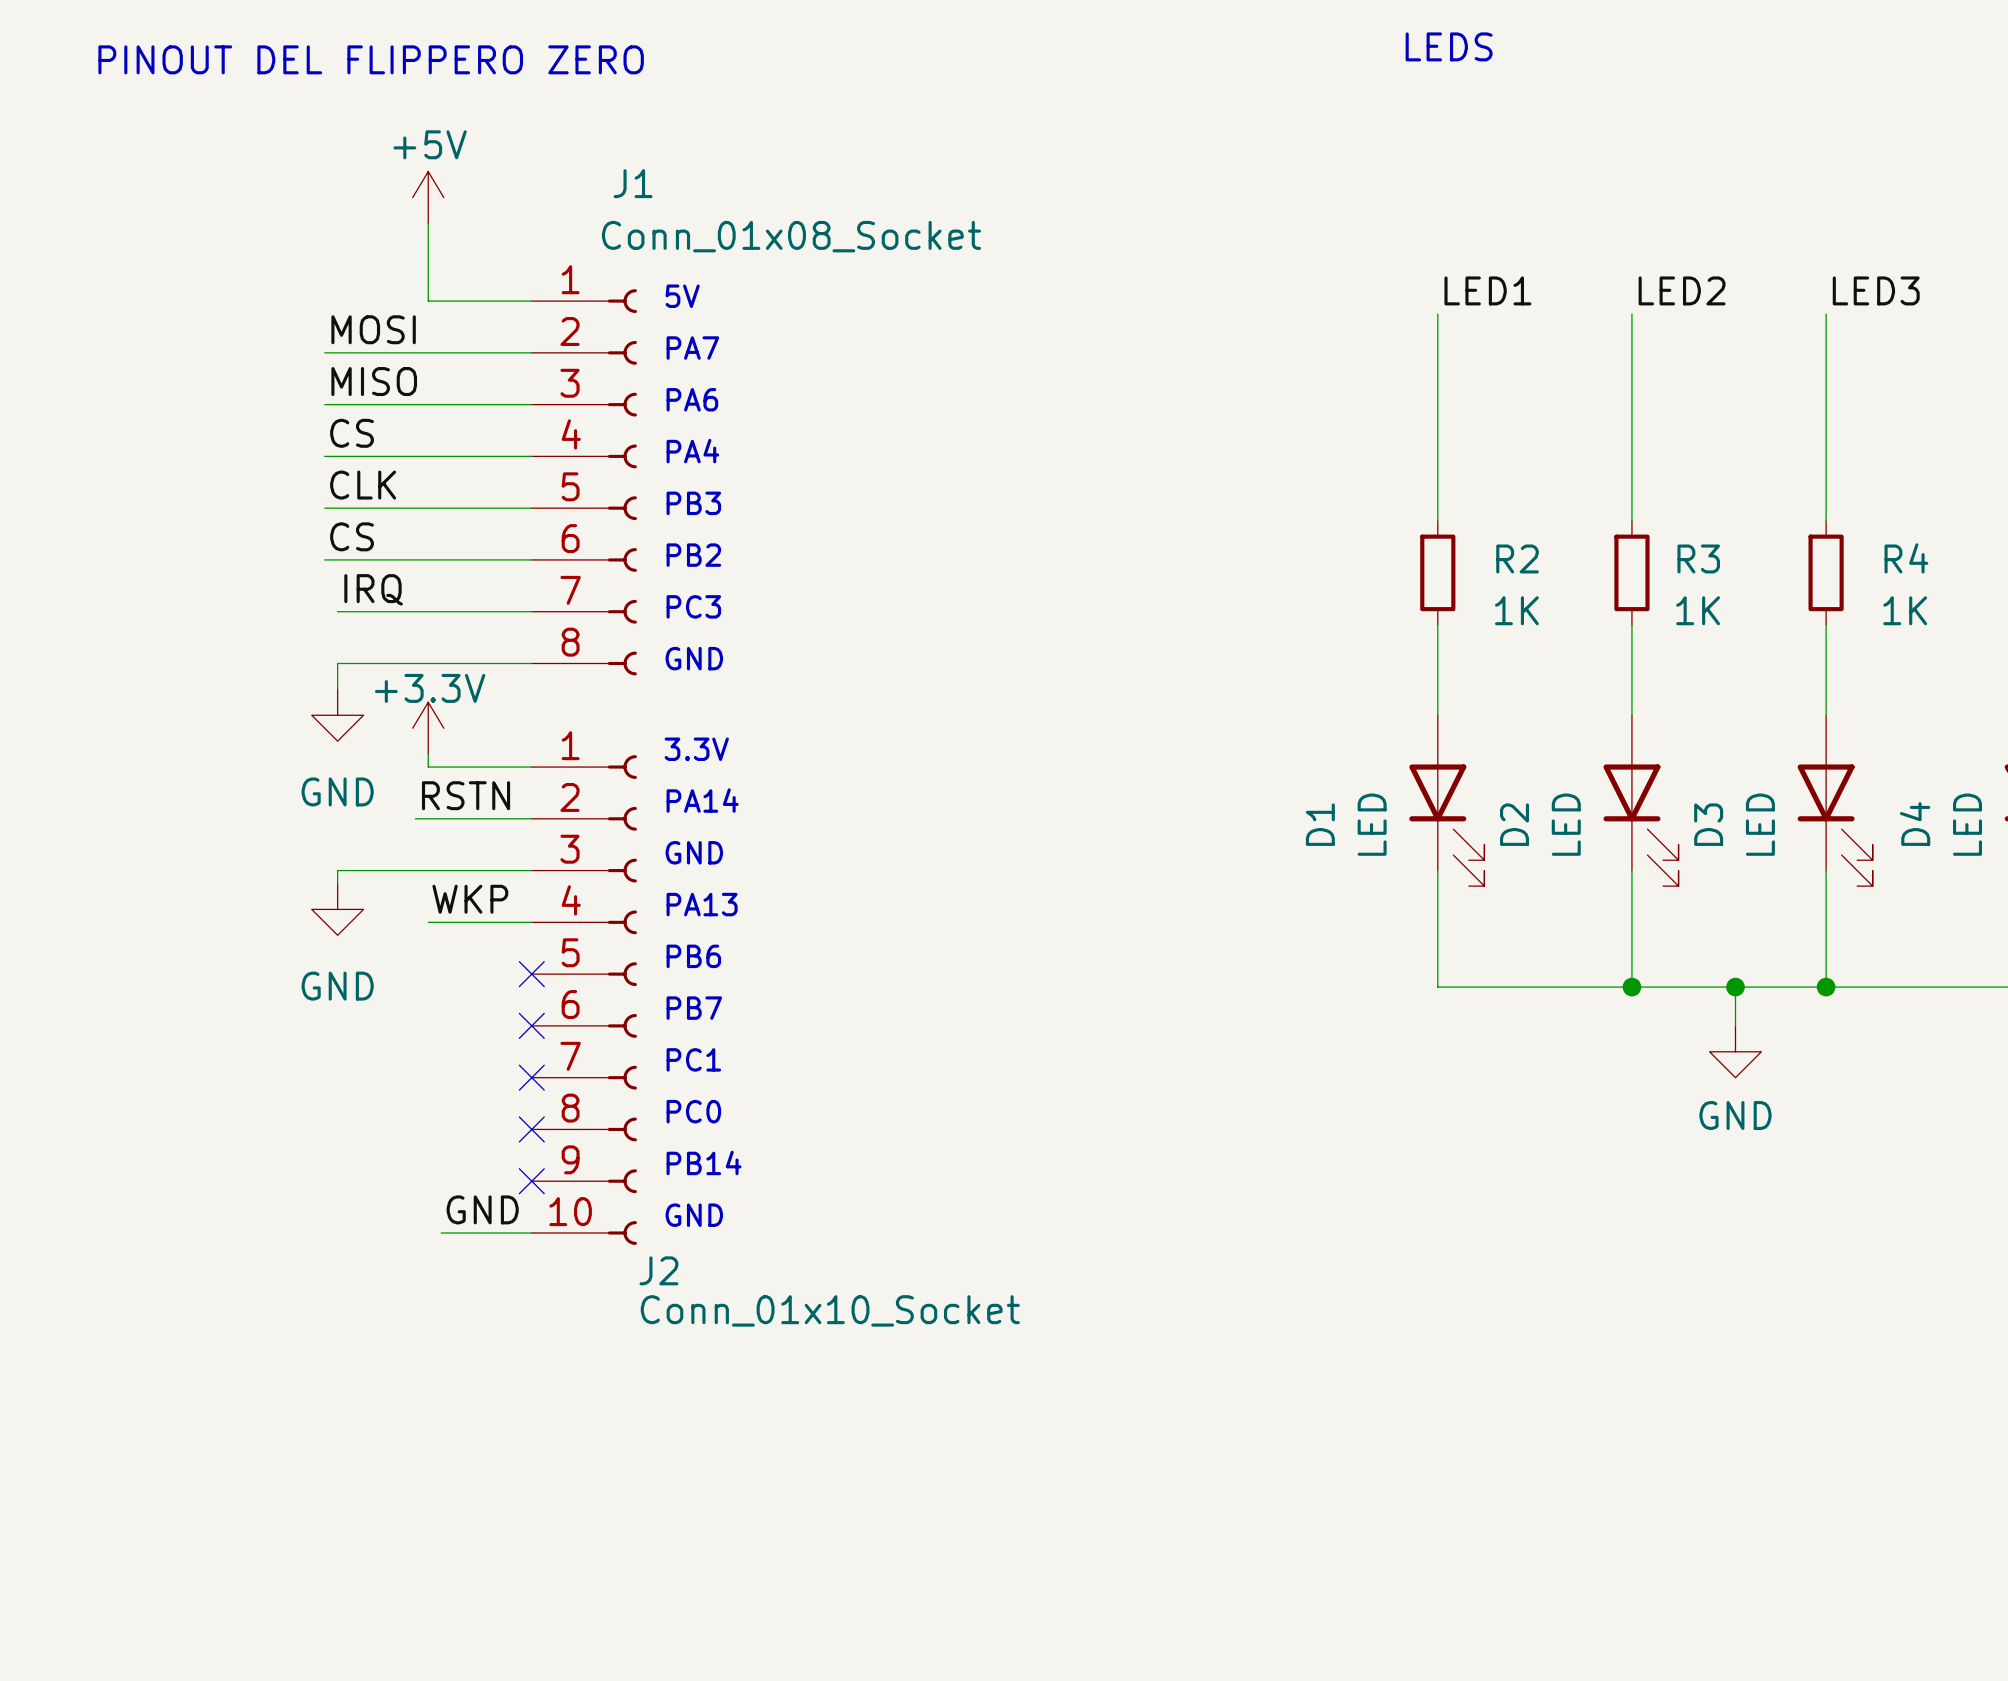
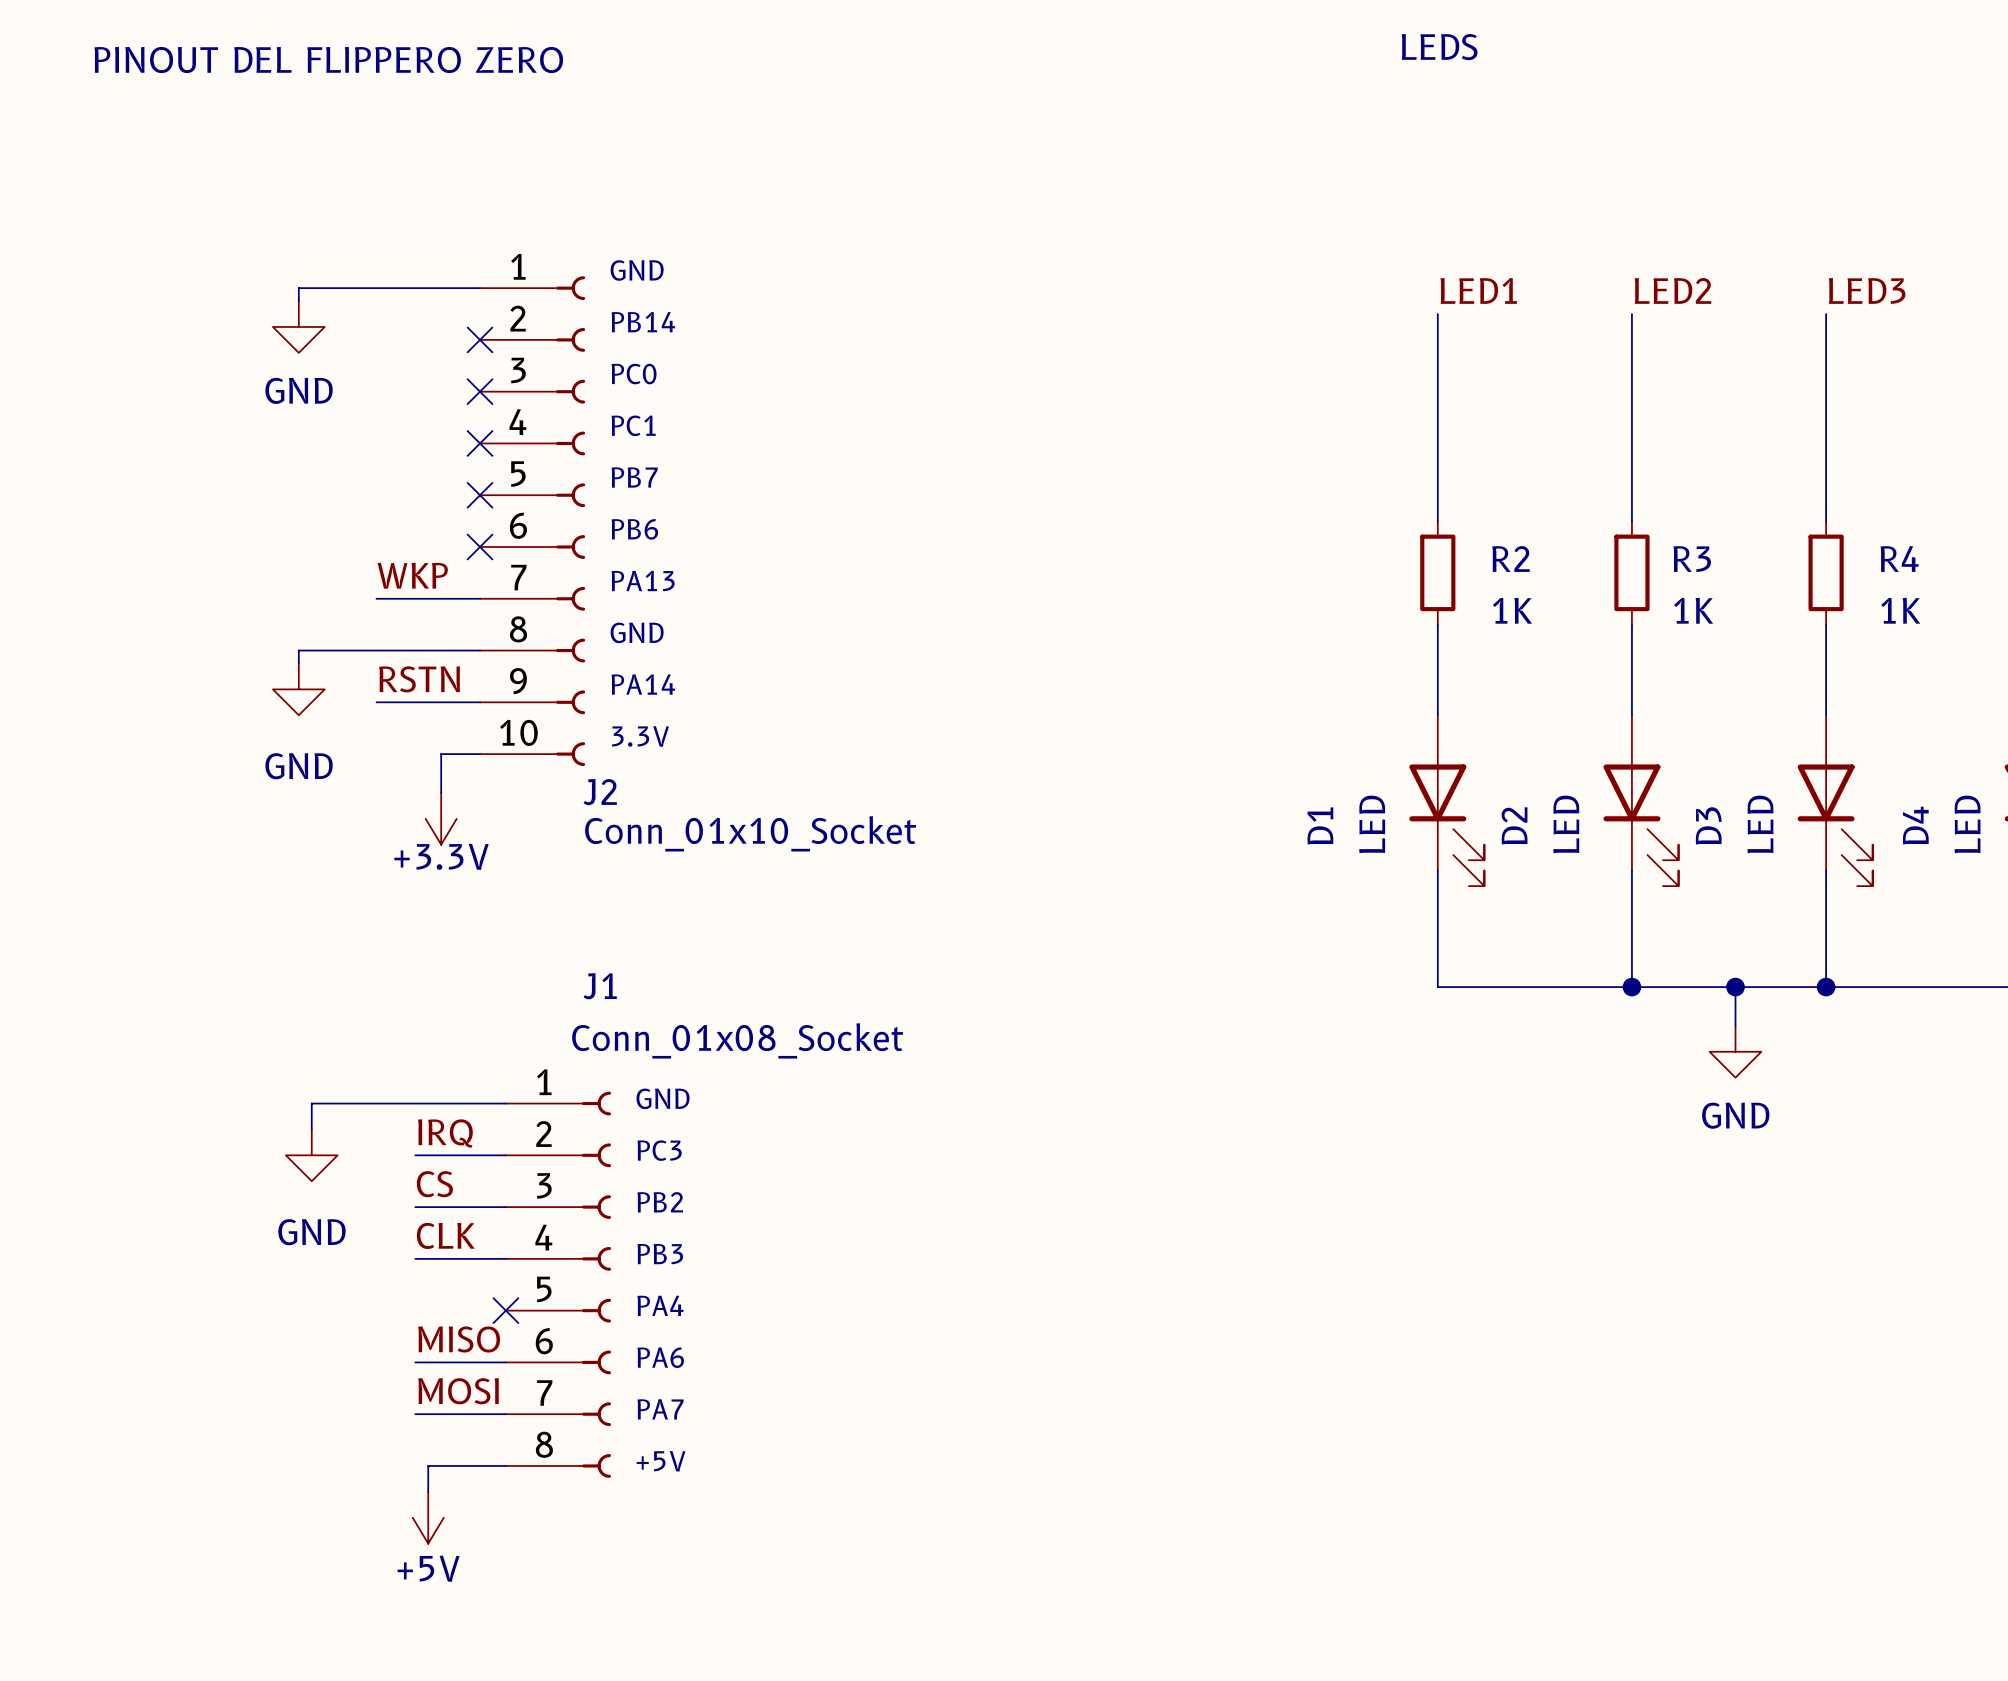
power symbol: +5V (428, 197) -> none
wire: (428, 223) (428, 301) (531, 301) -> none
text: none -> GND (637, 270)
wire: none -> (480, 288) (298, 288) (298, 301)
text: 5V (682, 296) -> none
text: none -> PB14 (643, 322)
power symbol: none -> GND (298, 326)
label: MOSI (373, 329) -> none
no-connect mark: none -> (480, 339)
text: PA7 (692, 348) -> none
wire: (324, 352) (531, 352) -> none
text: none -> PC0 (634, 374)
label: MISO (374, 381) -> none
no-connect mark: none -> (480, 391)
text: PA6 (692, 399) -> none
wire: (324, 404) (531, 404) -> none
text: none -> PC1 (633, 425)
label: CS (352, 433) -> none
no-connect mark: none -> (480, 443)
text: PA4 (692, 451) -> none
wire: (324, 456) (531, 456) -> none
J1 position: (584, 482) -> (558, 1284)
label: CLK (363, 485) -> none
no-connect mark: none -> (480, 495)
text: PB3 (693, 503) -> PB7 (634, 477)
wire: (324, 508) (531, 508) -> none
label: CS (352, 536) -> none
no-connect mark: none -> (480, 547)
text: PB2 (693, 555) -> none
wire: (324, 559) (531, 559) -> none
label: IRQ (373, 589) -> none
wire: none -> (376, 598) (480, 598)
text: PC3 (693, 606) -> none
wire: (337, 611) (531, 611) -> none
wire: none -> (480, 650) (298, 650) (298, 663)
text position: GND (694, 658) -> GND (637, 632)
wire: (531, 663) (337, 663) (337, 689) -> (505, 1103) (311, 1103) (311, 1129)
power symbol position: GND (337, 715) -> GND (298, 689)
power symbol rotation: 0° (428, 728) -> 180° (441, 818)
power symbol position: +3.3V (428, 728) -> +3.3V (441, 818)
text position: 3.3V (696, 749) -> 3.3V (640, 736)
wire: (428, 754) (428, 767) (531, 767) -> none
wire: none -> (480, 754) (441, 754) (441, 792)
label position: RSTN (466, 795) -> RSTN (419, 679)
text position: PA14 (702, 800) -> PA14 (643, 684)
wire: (415, 818) (531, 818) -> none
text: GND (694, 852) -> none
wire: (531, 870) (337, 870) (337, 883) -> none
label position: WKP (470, 899) -> WKP (412, 575)
text position: PA13 (702, 904) -> PA13 (643, 580)
power symbol: GND (337, 909) -> none
wire: (428, 922) (531, 922) -> (376, 702) (480, 702)
text position: PB6 (693, 956) -> PB6 (634, 529)
no-connect mark: (531, 974) -> none
J2 position: (584, 1000) -> (532, 521)
text: PB7 (694, 1008) -> none
no-connect mark: (531, 1025) -> none
text: PC1 (693, 1059) -> none
no-connect mark: (531, 1077) -> none
text: PC0 (693, 1111) -> PC3 (659, 1150)
no-connect mark: (531, 1129) -> none
label: none -> IRQ (445, 1133)
power symbol: none -> GND (311, 1155)
wire: none -> (415, 1155) (505, 1155)
text: PB14 (704, 1162) -> none
no-connect mark: (531, 1181) -> none
label: none -> CS (434, 1184)
text: none -> PB2 (660, 1202)
label: GND (482, 1209) -> none
text position: GND (694, 1215) -> GND (663, 1098)
wire: (441, 1232) (531, 1232) -> (415, 1207) (505, 1207)
label: none -> CLK (445, 1235)
text: none -> PB3 (660, 1254)
wire: none -> (415, 1258) (505, 1258)
text: none -> PA4 (660, 1305)
no-connect mark: none -> (505, 1310)
label: none -> MISO (459, 1339)
text: none -> PA6 (660, 1357)
wire: none -> (415, 1362) (505, 1362)
label: none -> MOSI (458, 1391)
text: none -> PA7 (660, 1409)
wire: none -> (415, 1414) (505, 1414)
text: none -> +5V (661, 1461)
wire: none -> (505, 1465) (428, 1465) (428, 1491)
power symbol: none -> +5V (428, 1517)

